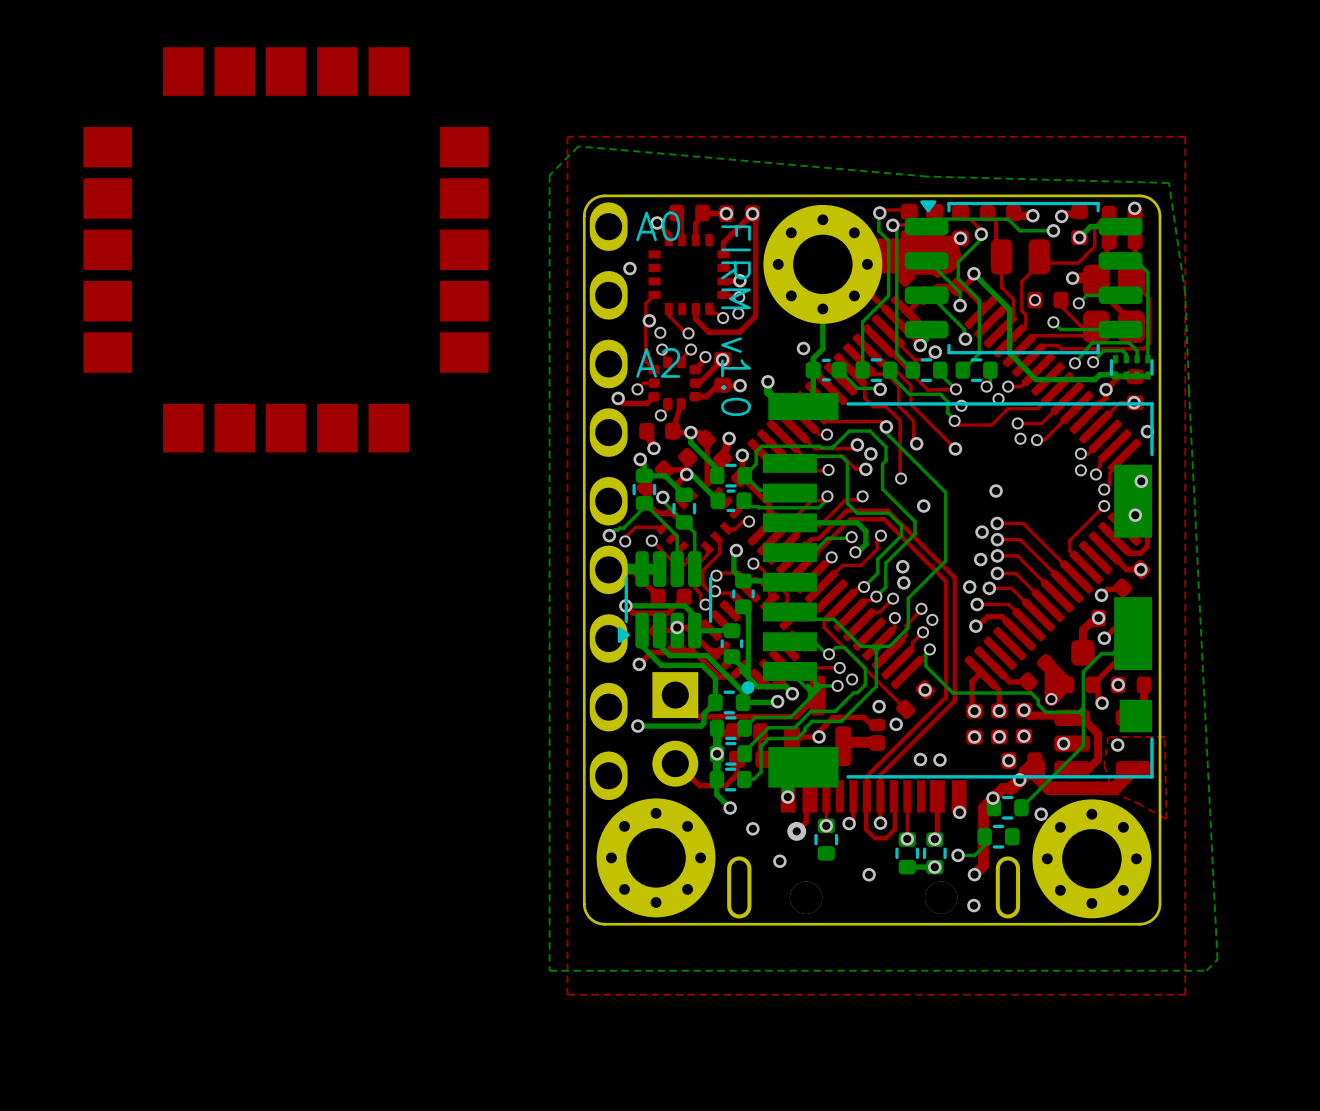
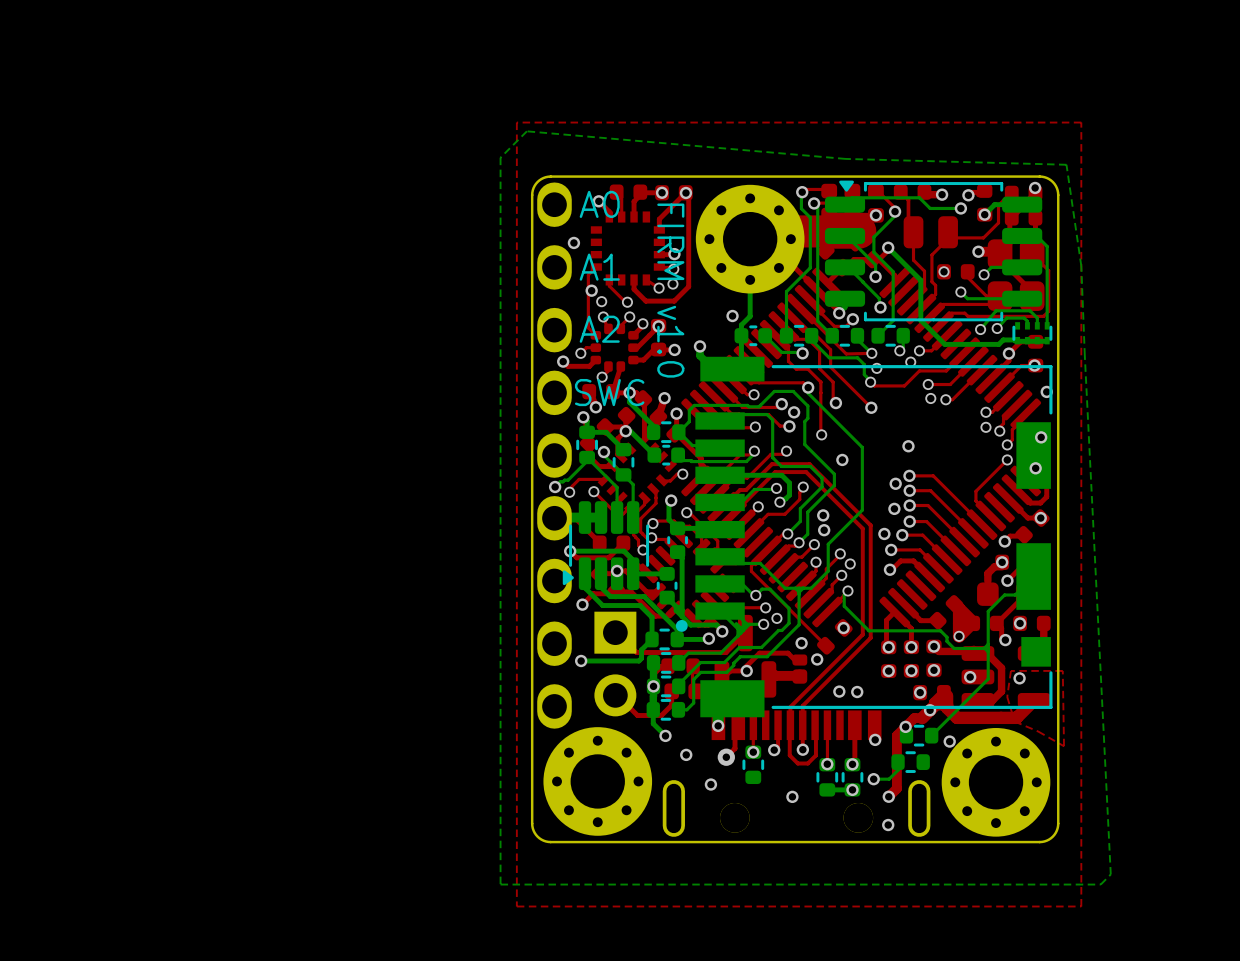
part: (286, 249) -> none
A1 name: none -> A1 (599, 267)
SWC name: none -> SWC (609, 392)

